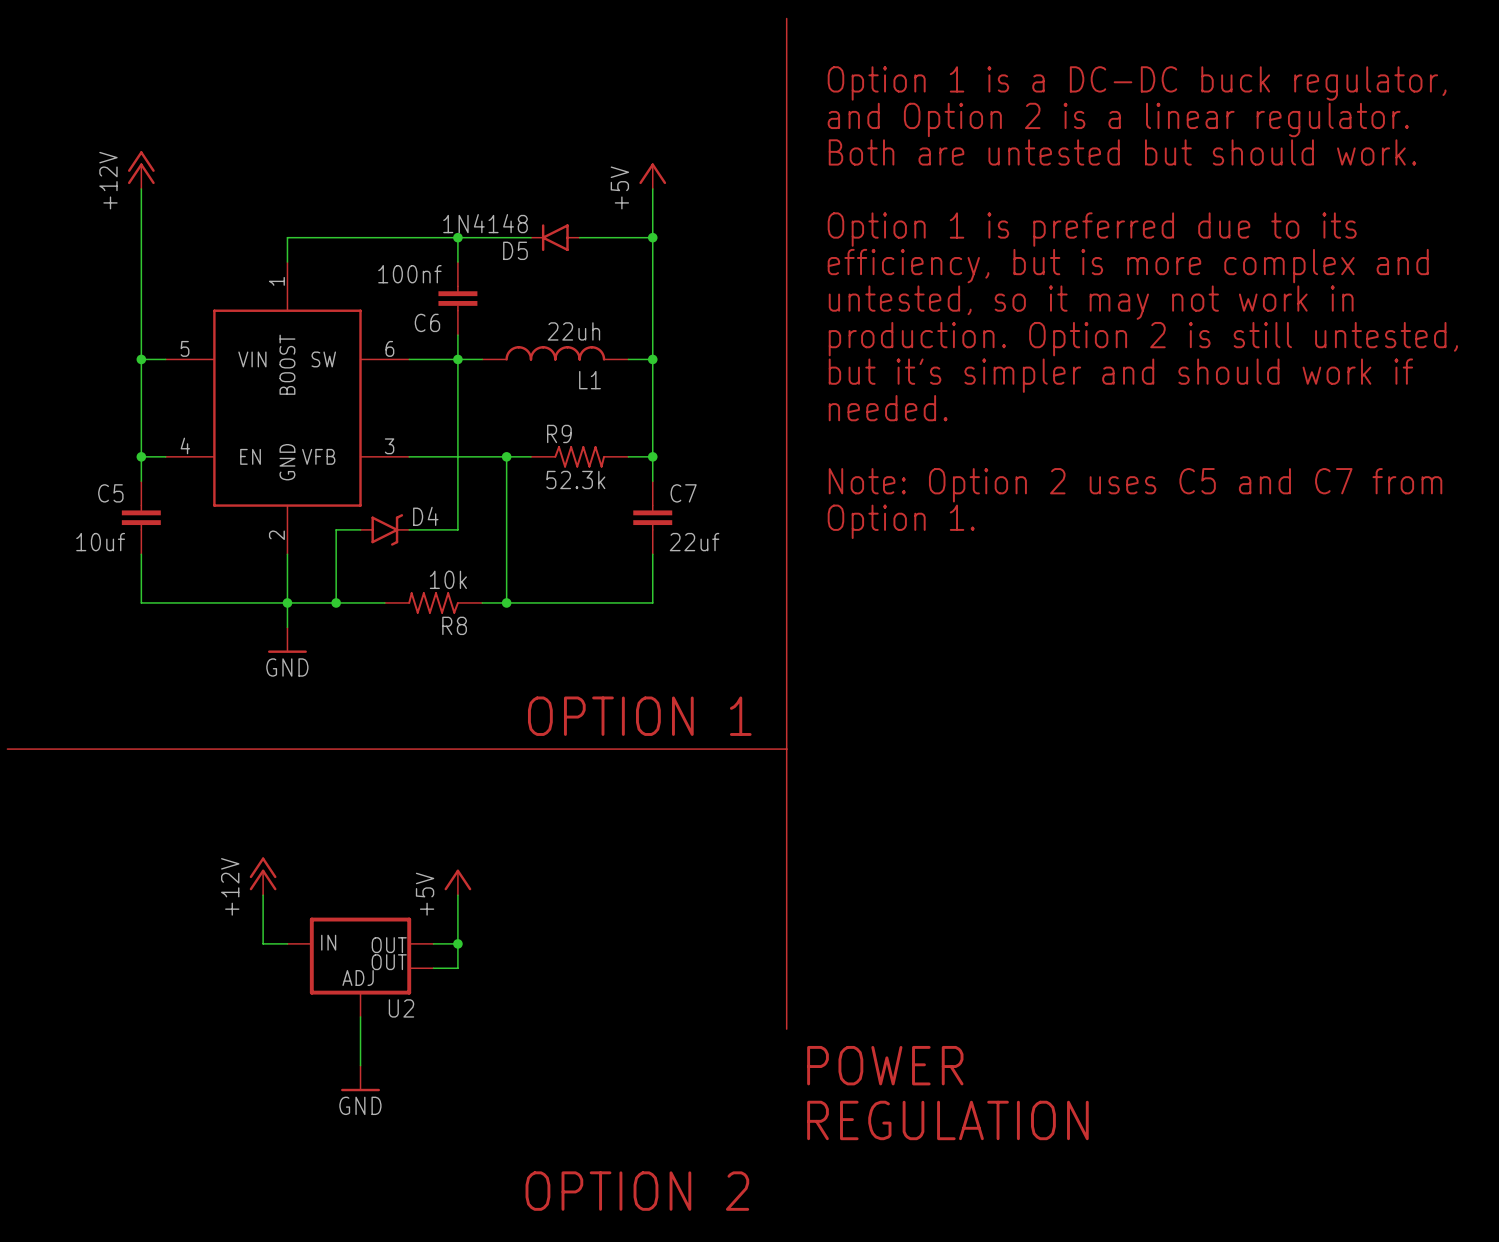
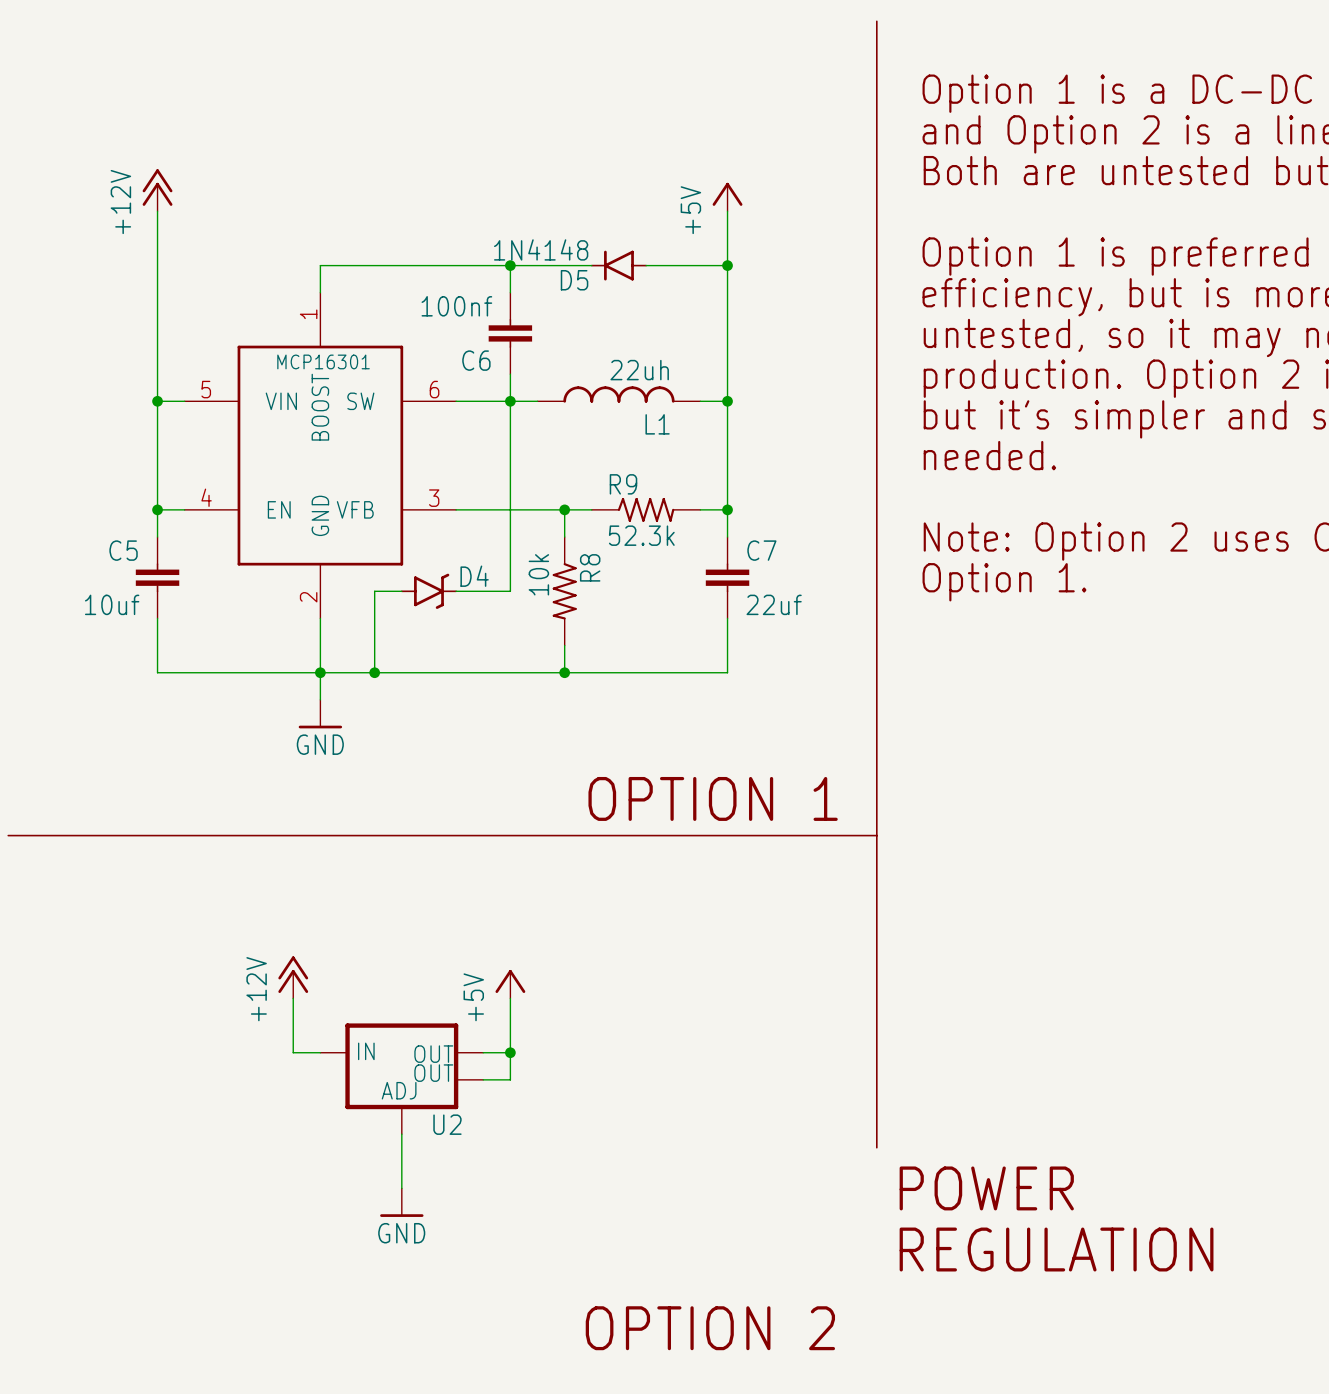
text: none -> MCP16301 (323, 361)
R8 rotation: 0° (433, 602) -> 90° counterclockwise (564, 591)
R8 position: (433, 602) -> (564, 591)

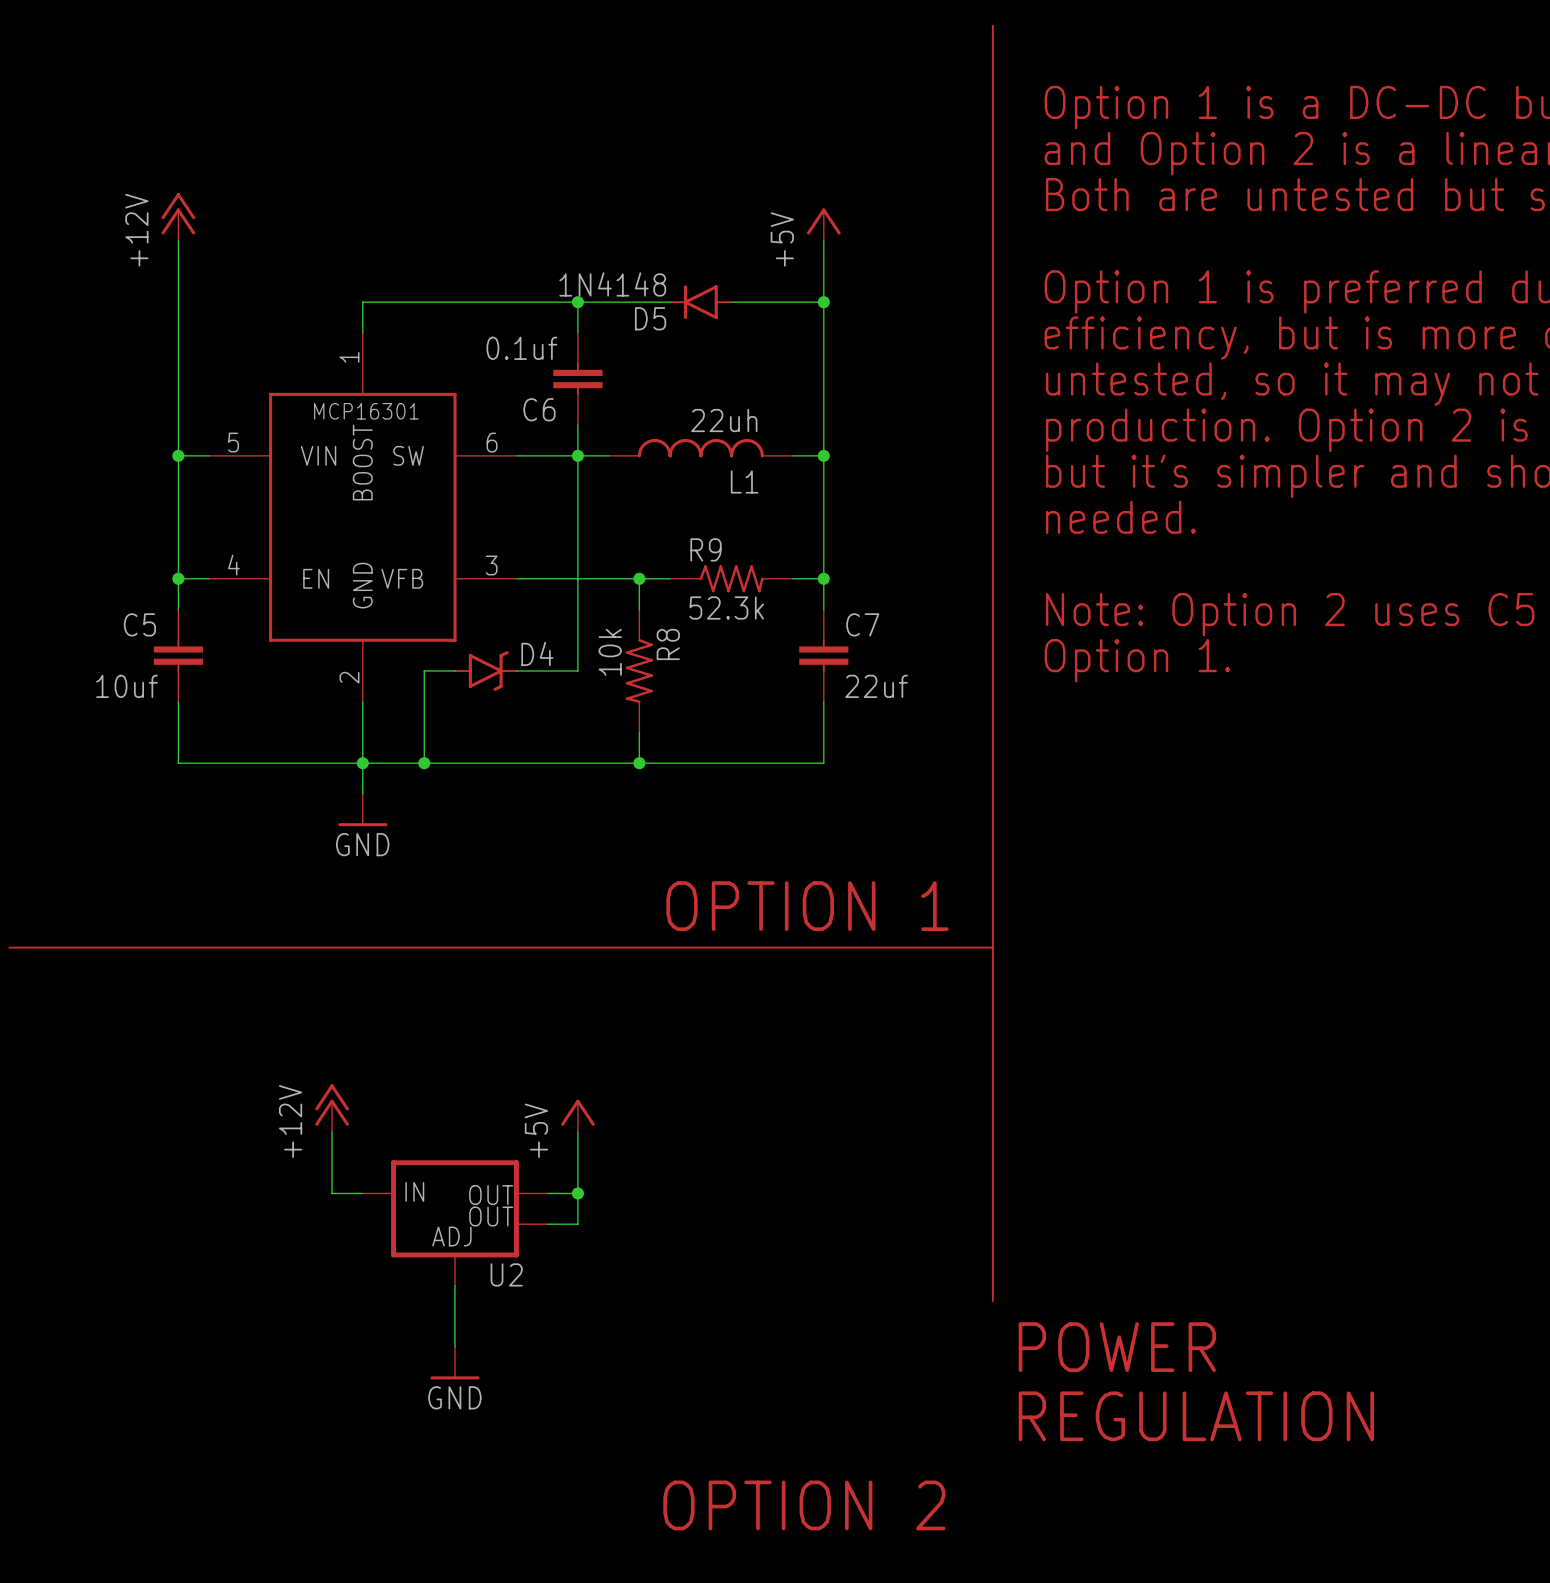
C6 value: 100nf (456, 306) -> 0.1uf (521, 348)

